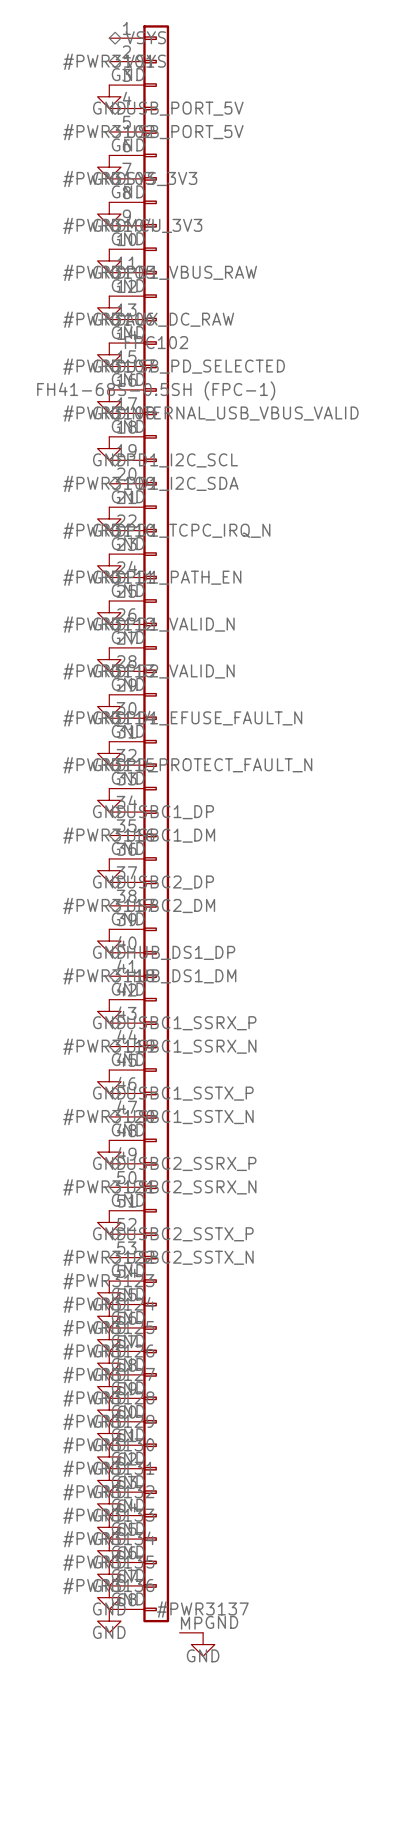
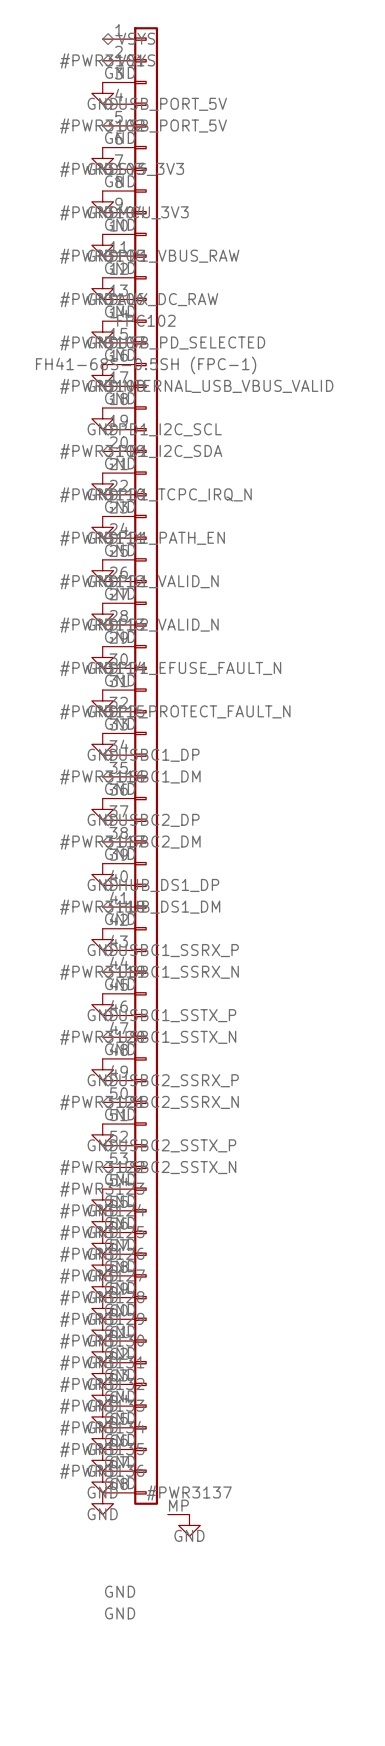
label: GND (221, 1622) -> none
label: none -> GND (120, 1591)
label: none -> GND (120, 1613)

